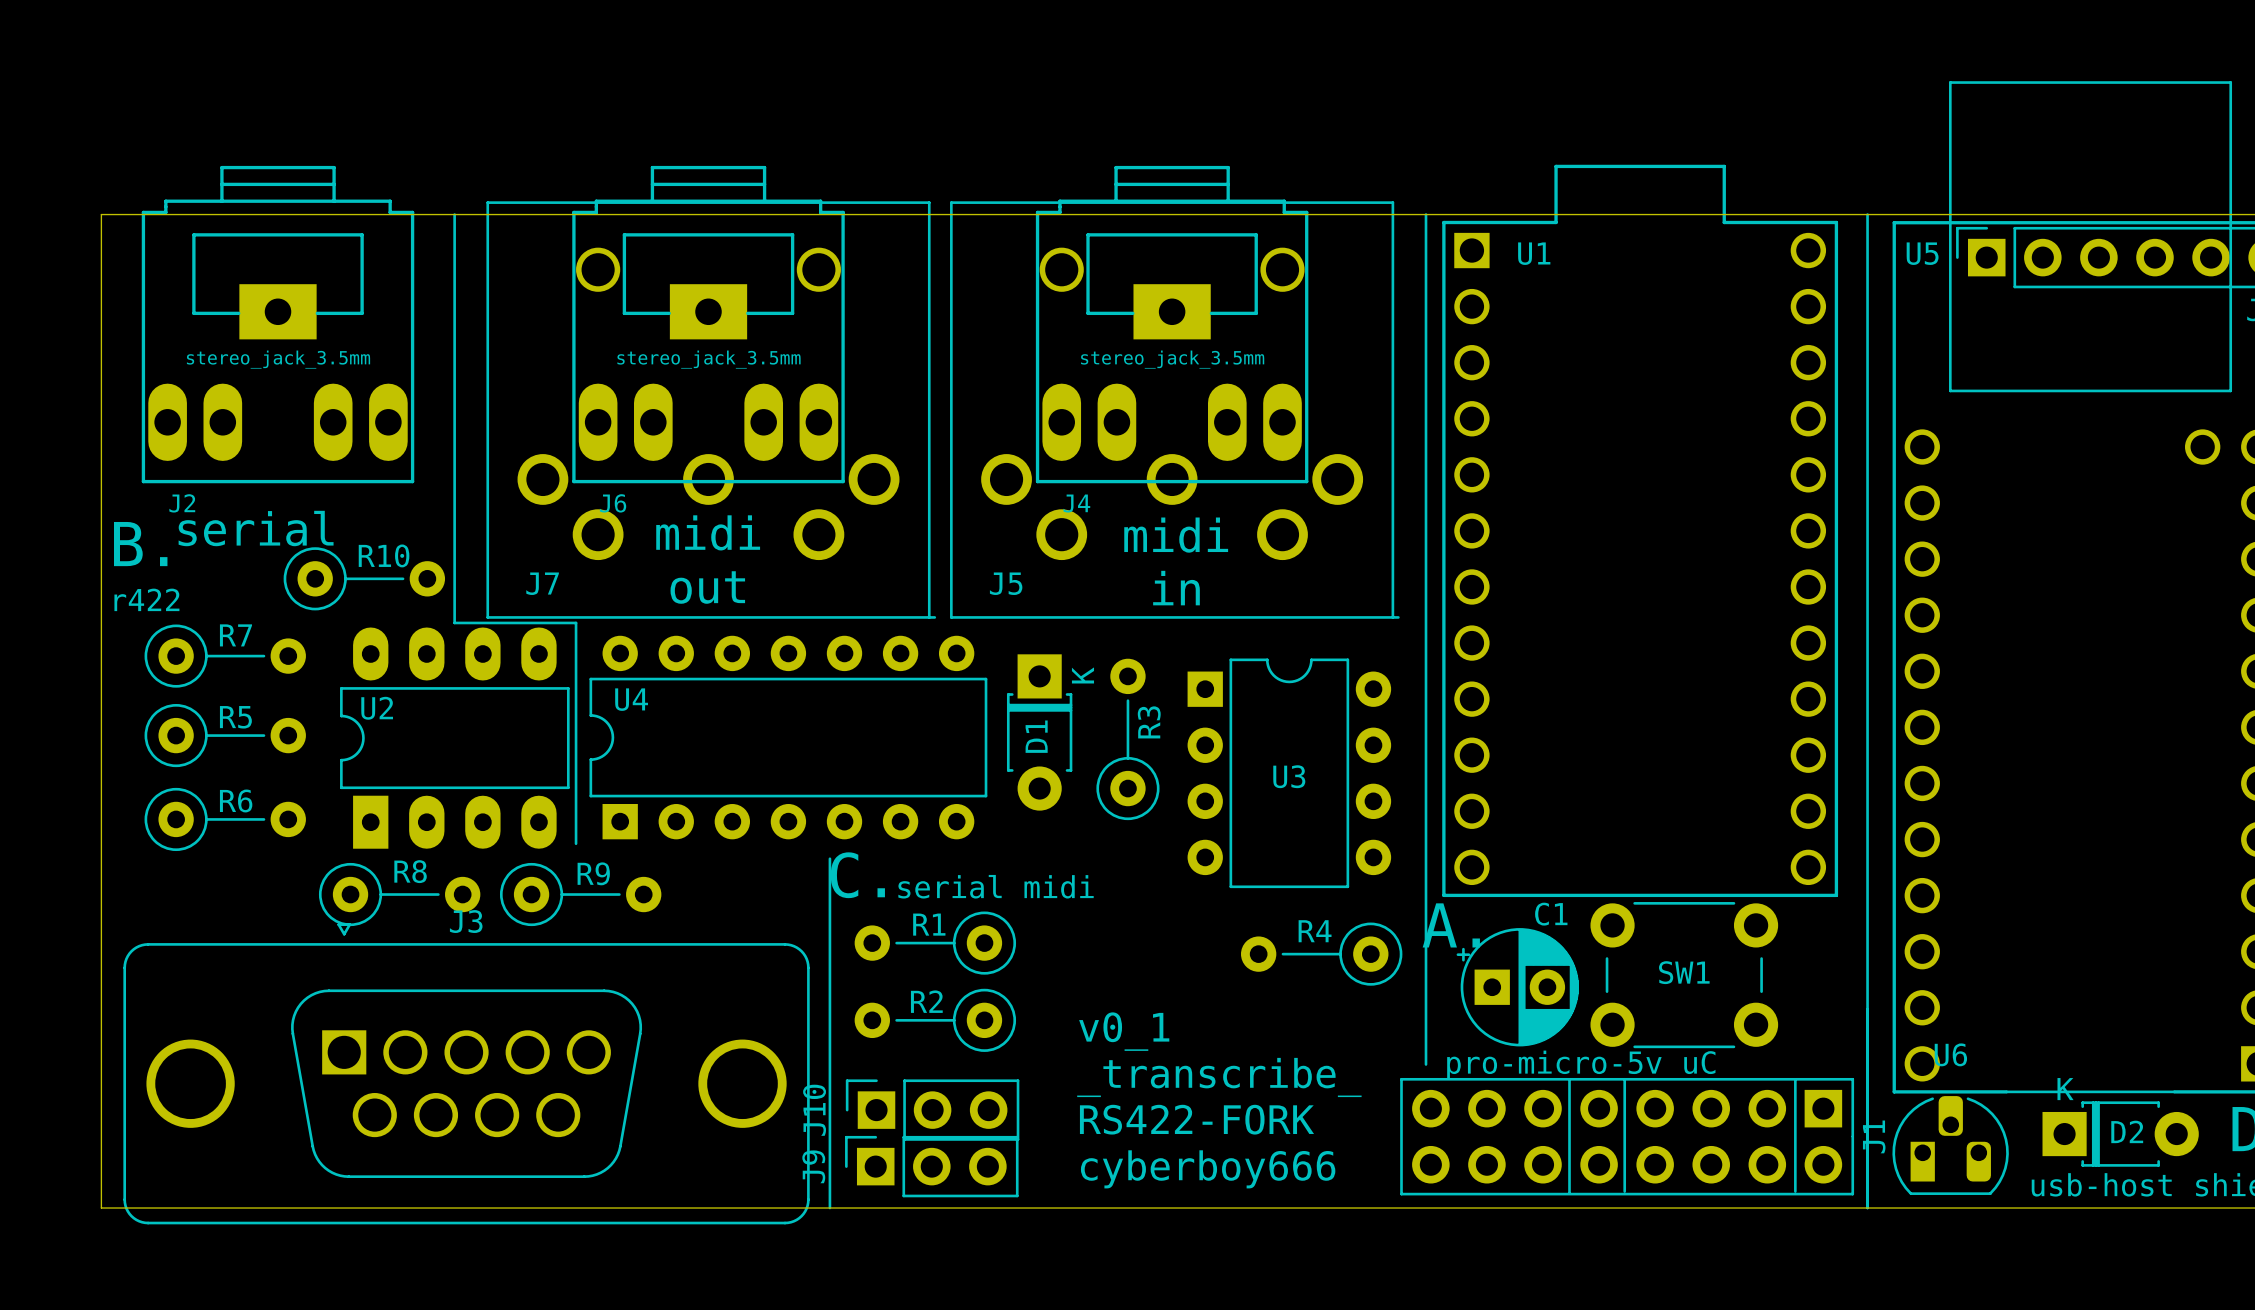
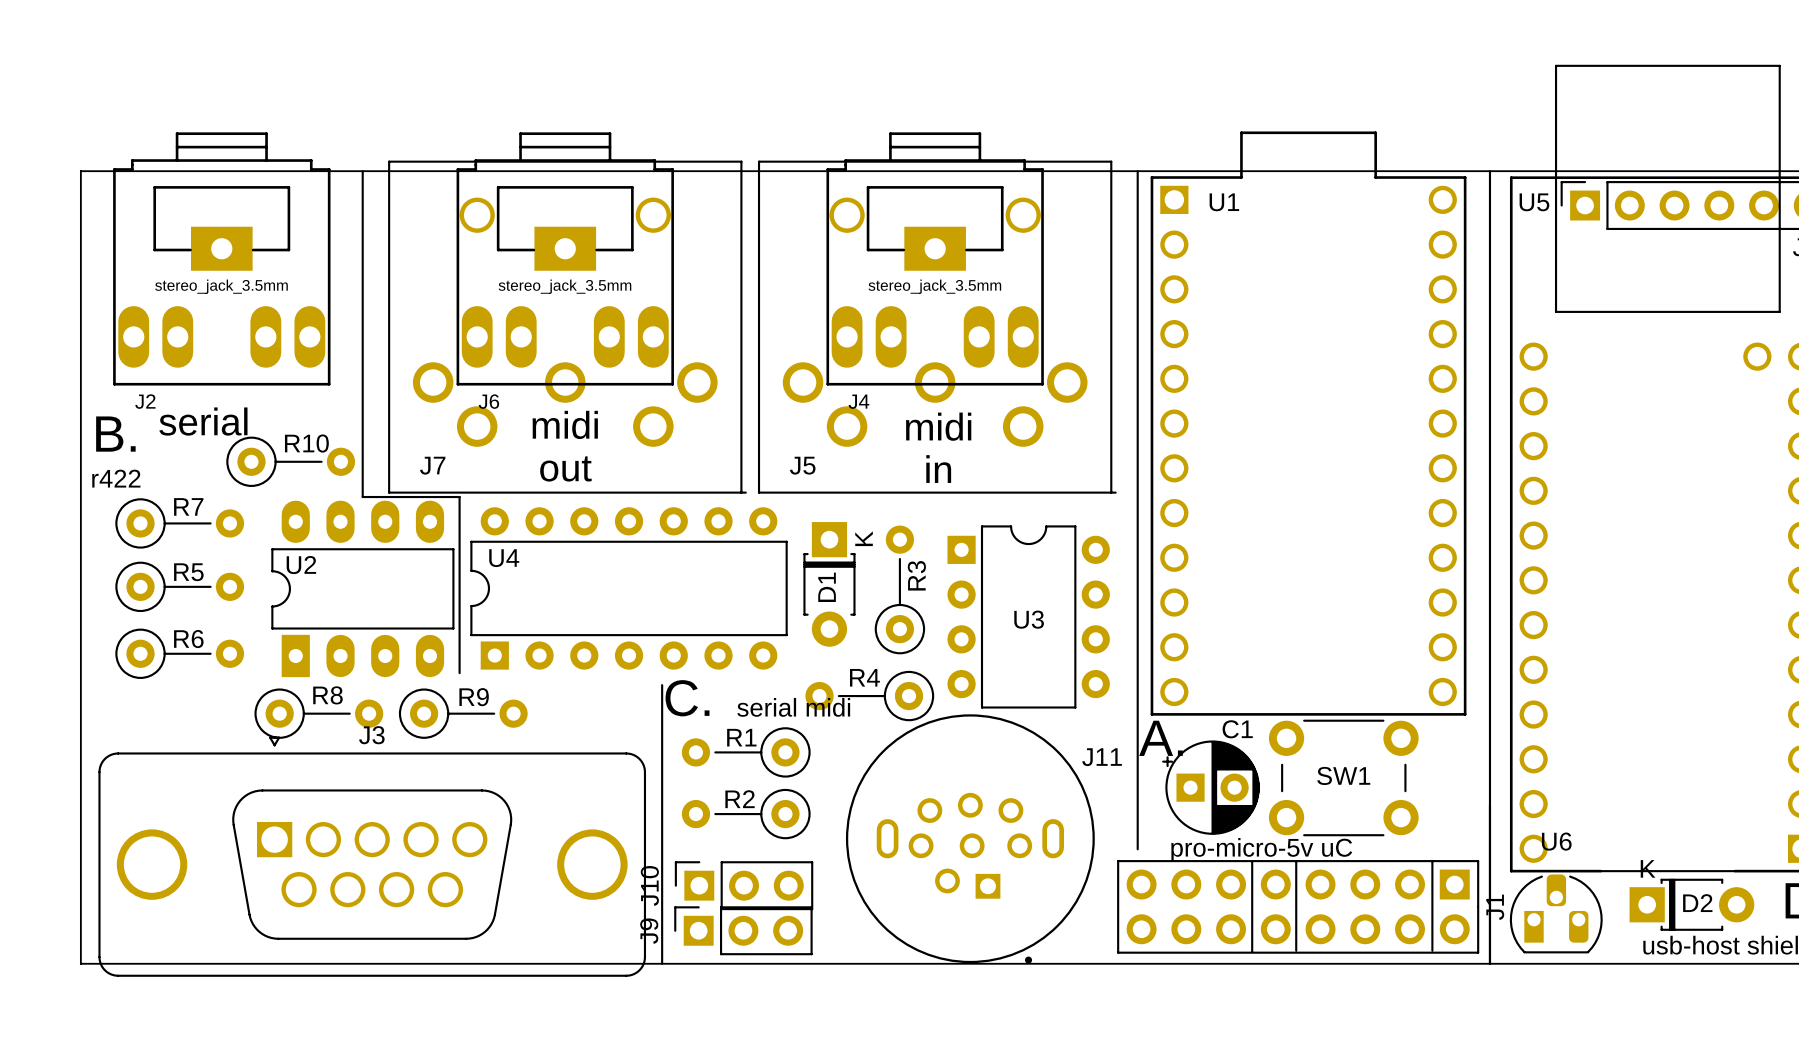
R4 position: (1321, 954) -> (869, 696)
text: v0_1 (1124, 1031) -> none
J11: none -> (970, 838)
text: _transcribe_ (1219, 1077) -> none
text: RS422-FORK (1196, 1119) -> none
text: cyberboy666 (1208, 1169) -> none

